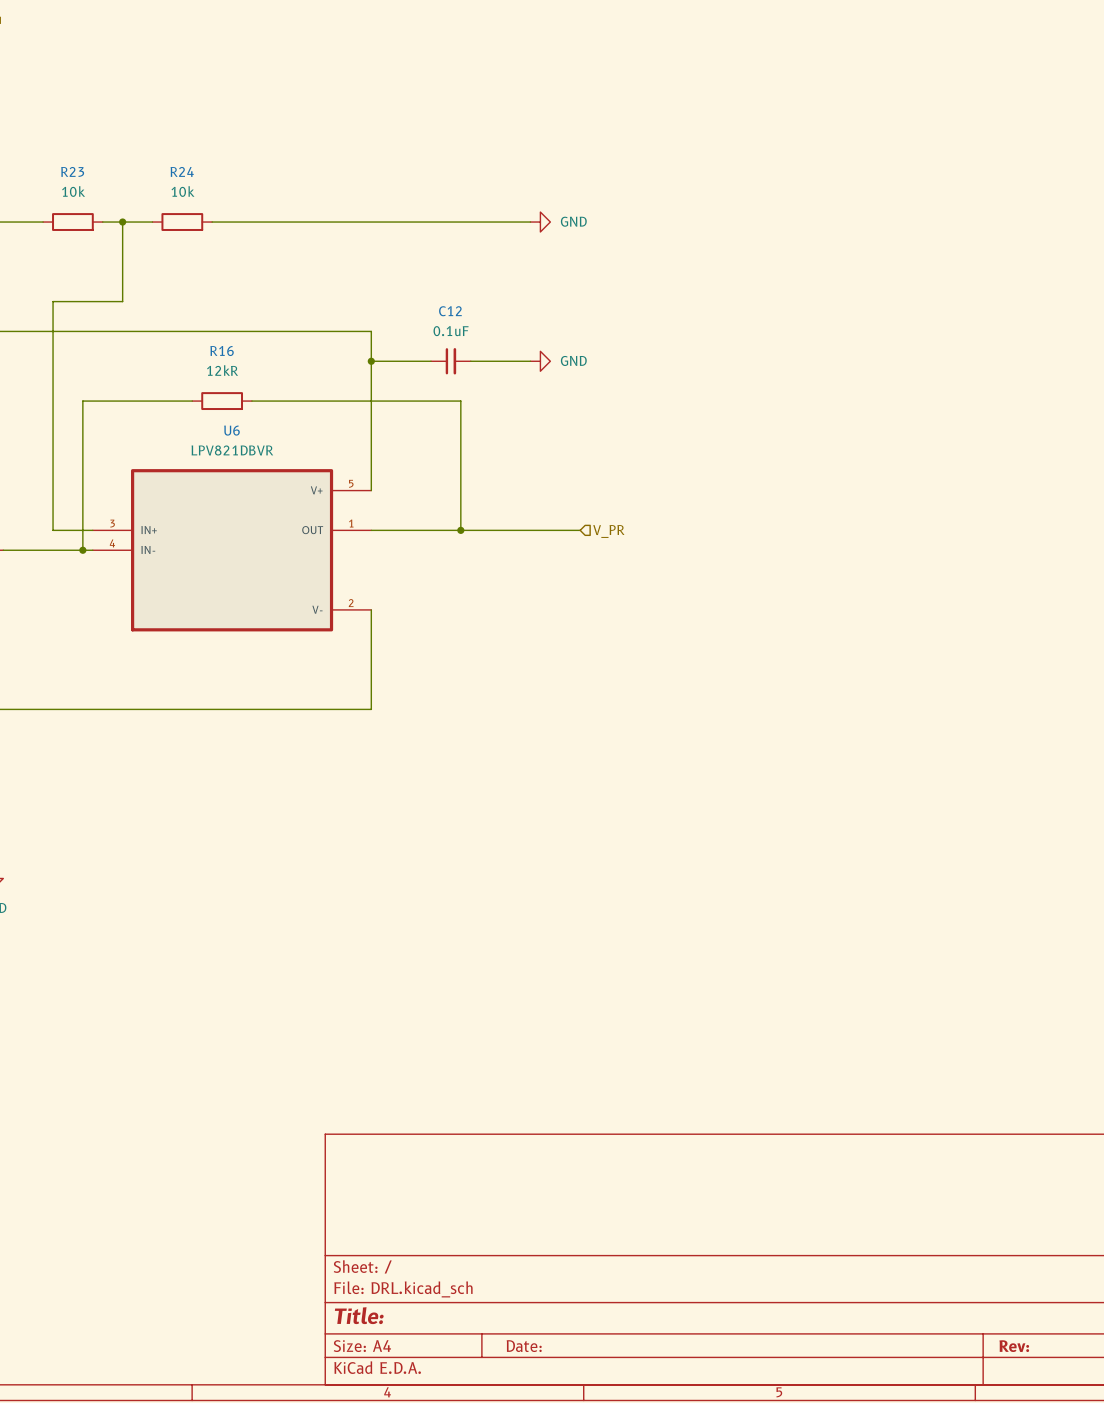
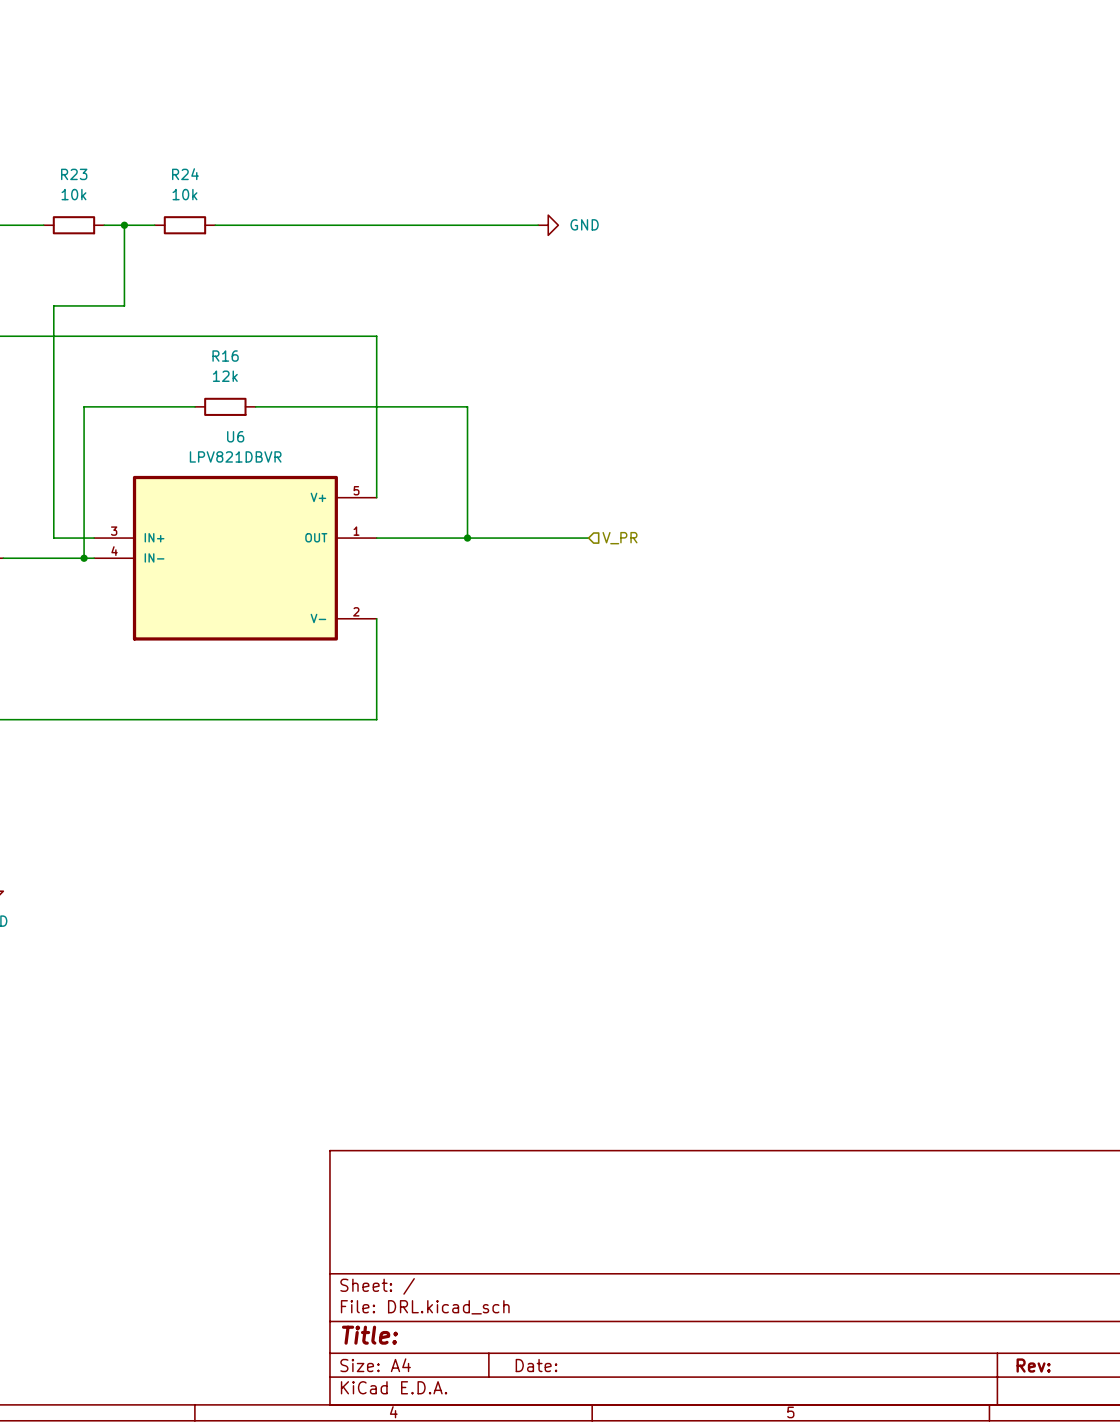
wire: (371, 361) (430, 361) -> none
junction: (371, 361) -> none
C12: 0.1uF (450, 361) -> none
wire: (470, 361) (530, 361) -> none
power symbol: GND (540, 361) -> none
R16 value: 12kR (222, 370) -> 12k (225, 376)

